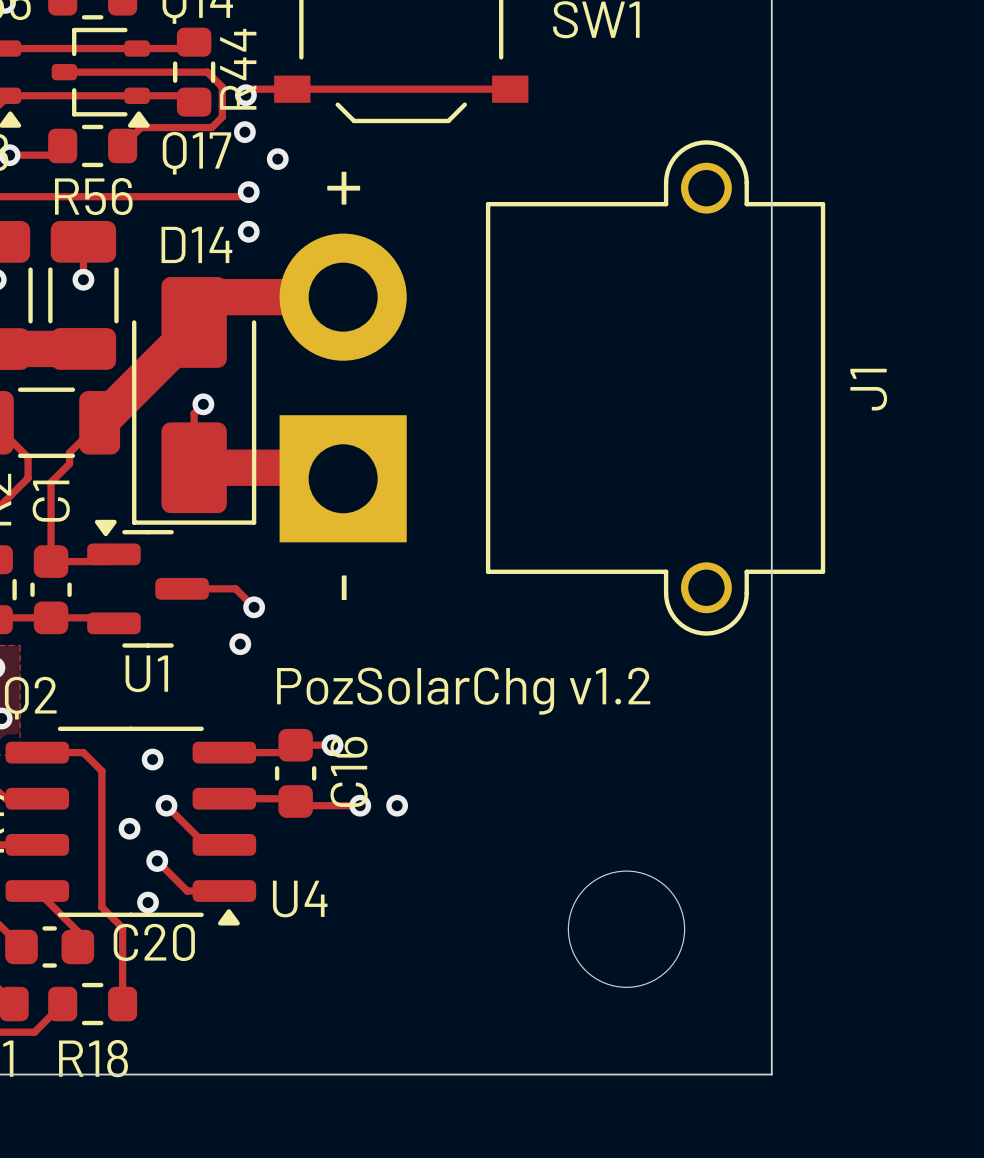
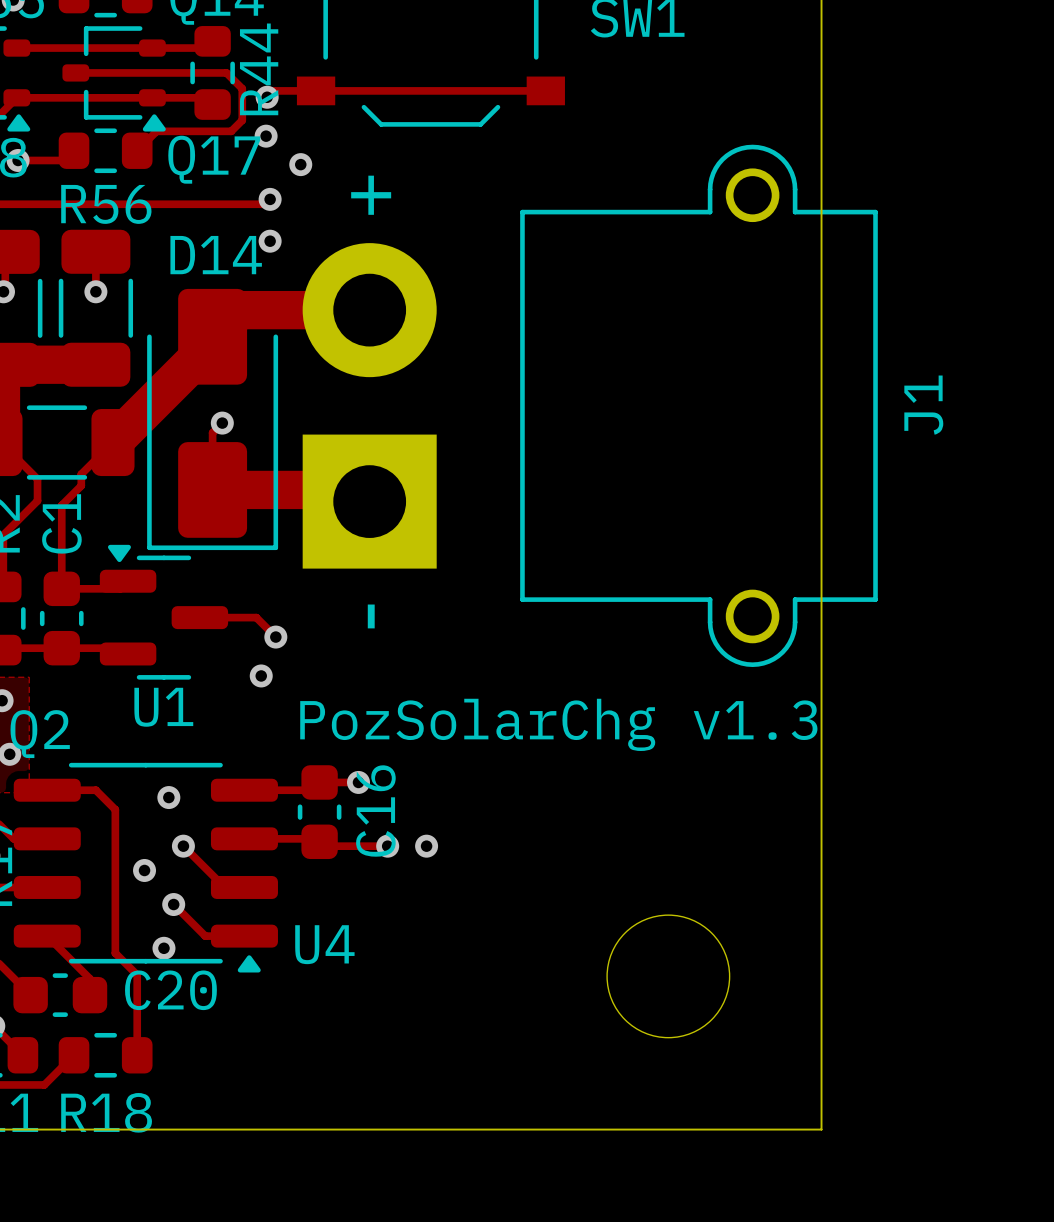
text: PozSolarChg v1.2 (463, 691) -> PozSolarChg v1.3 (558, 724)

